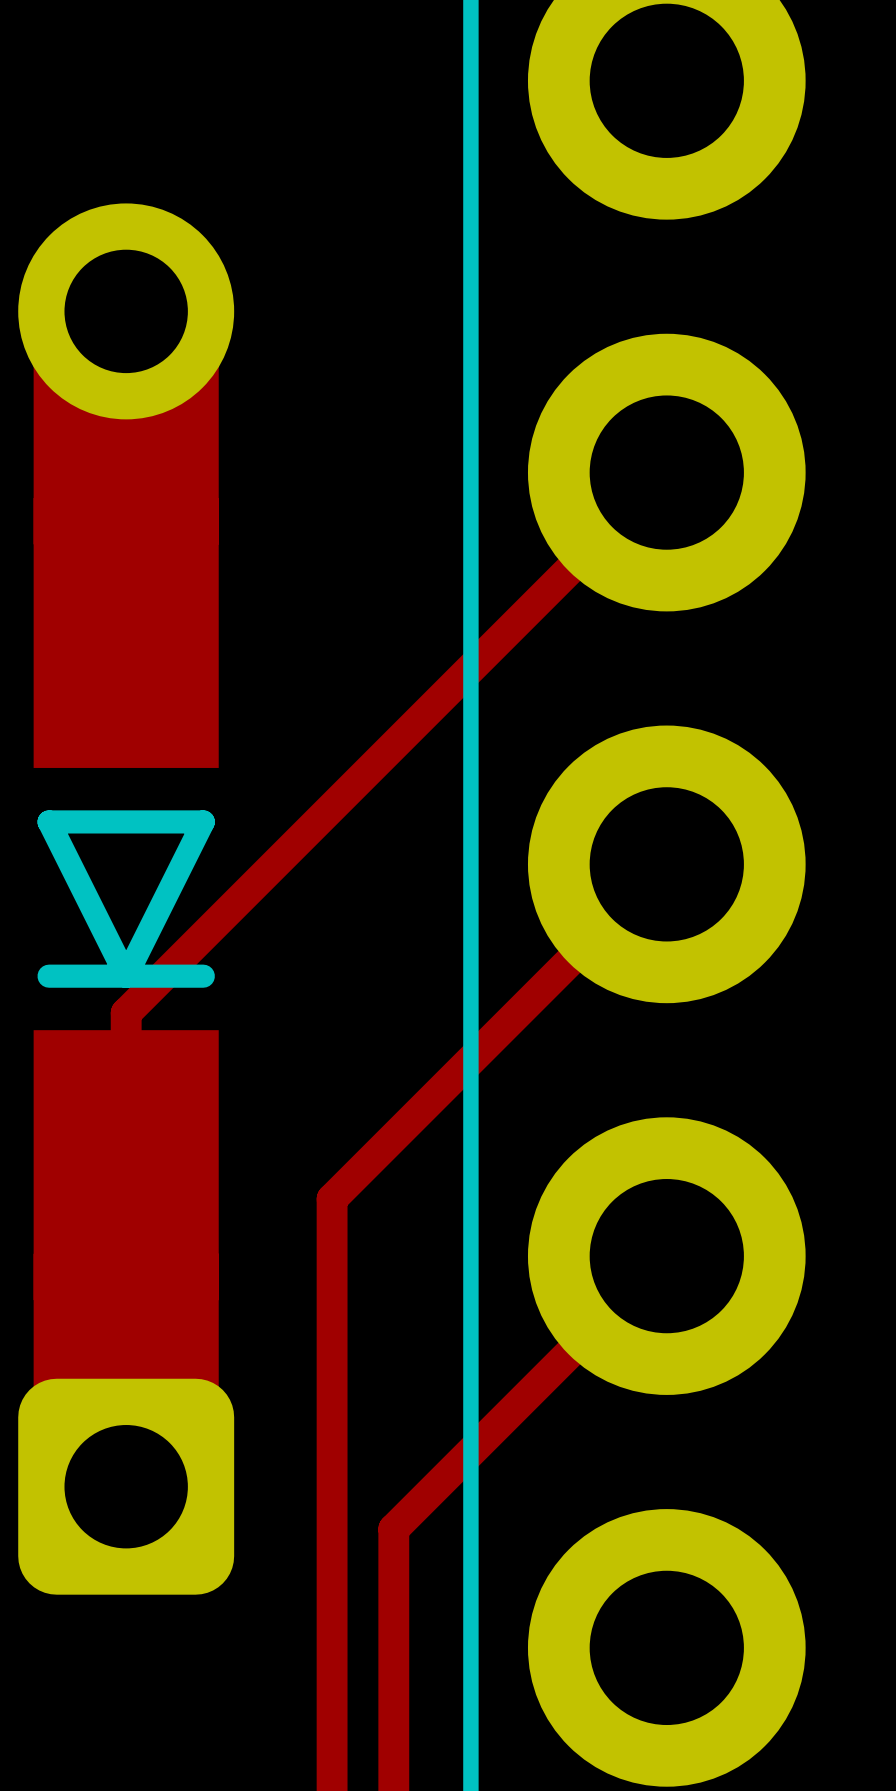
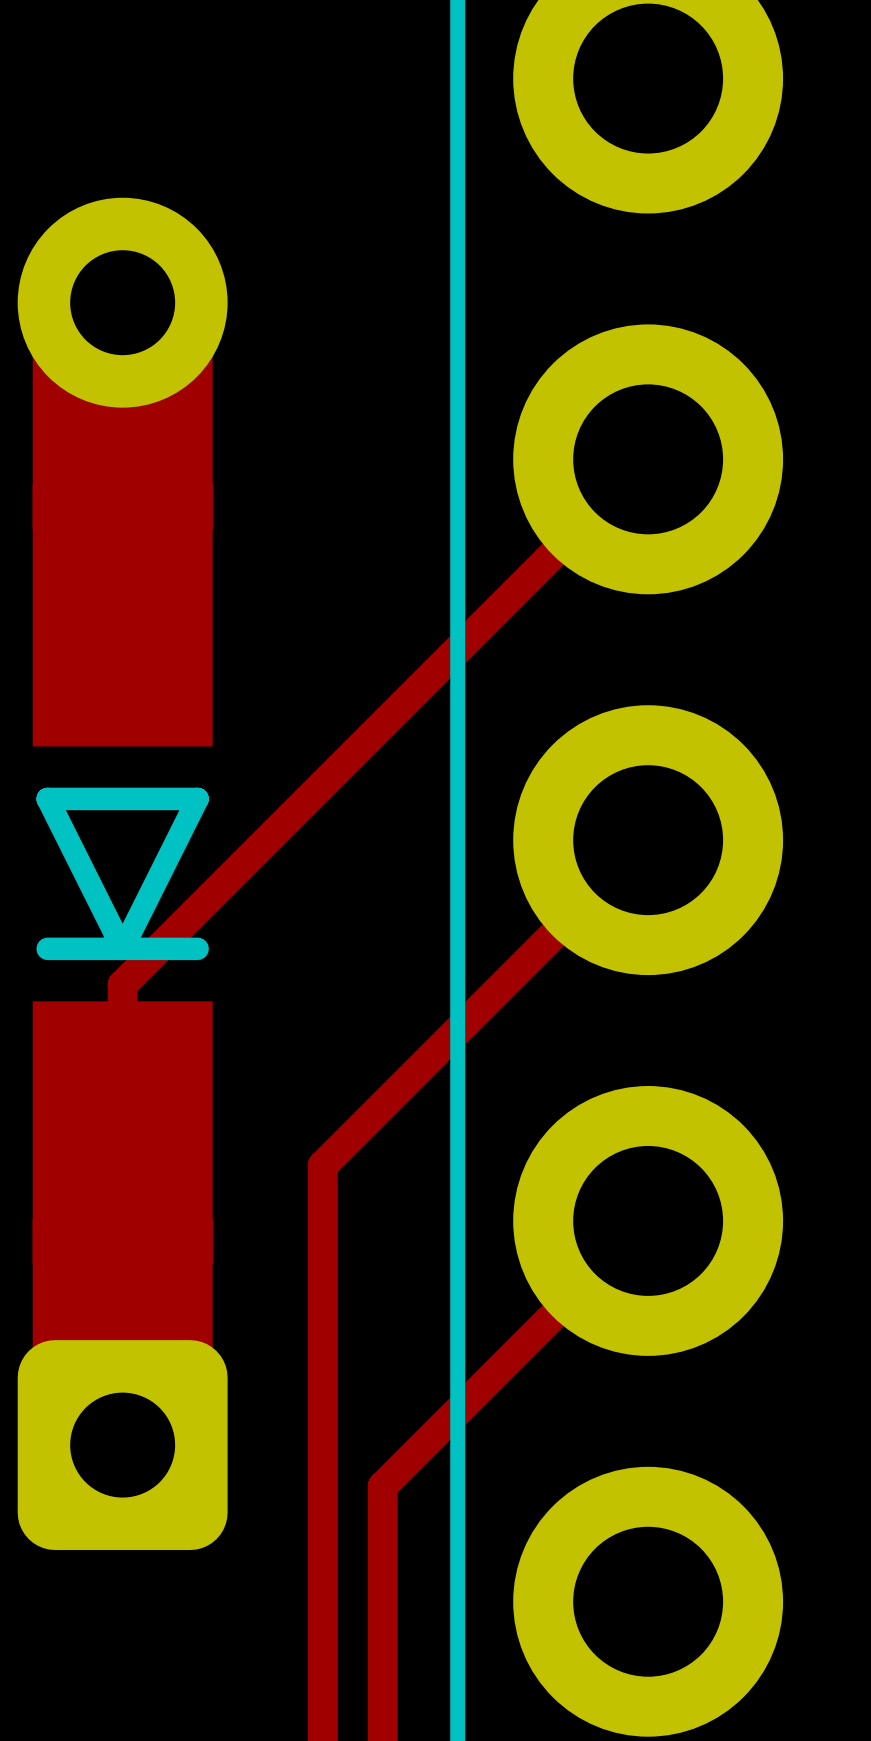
part footprint: [18, 203, 235, 1595] -> [17, 197, 228, 1551]

